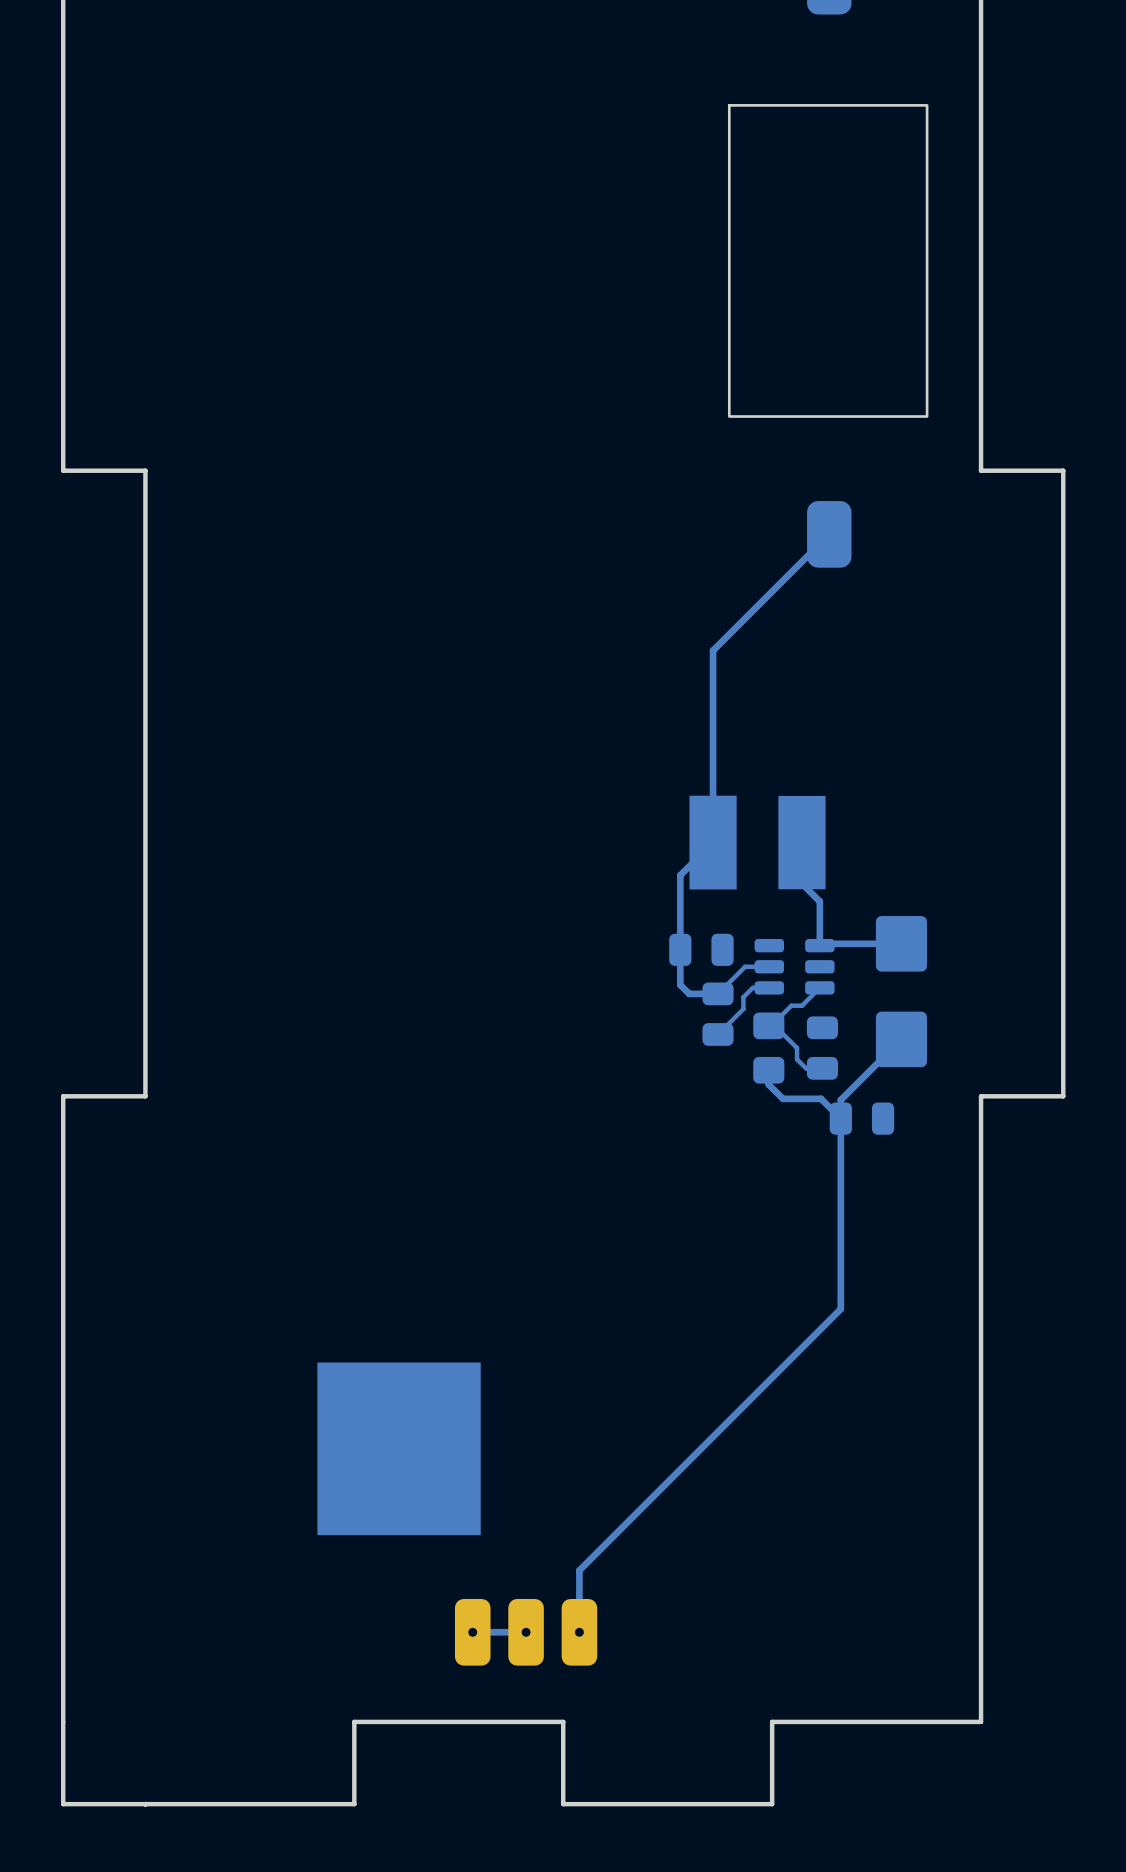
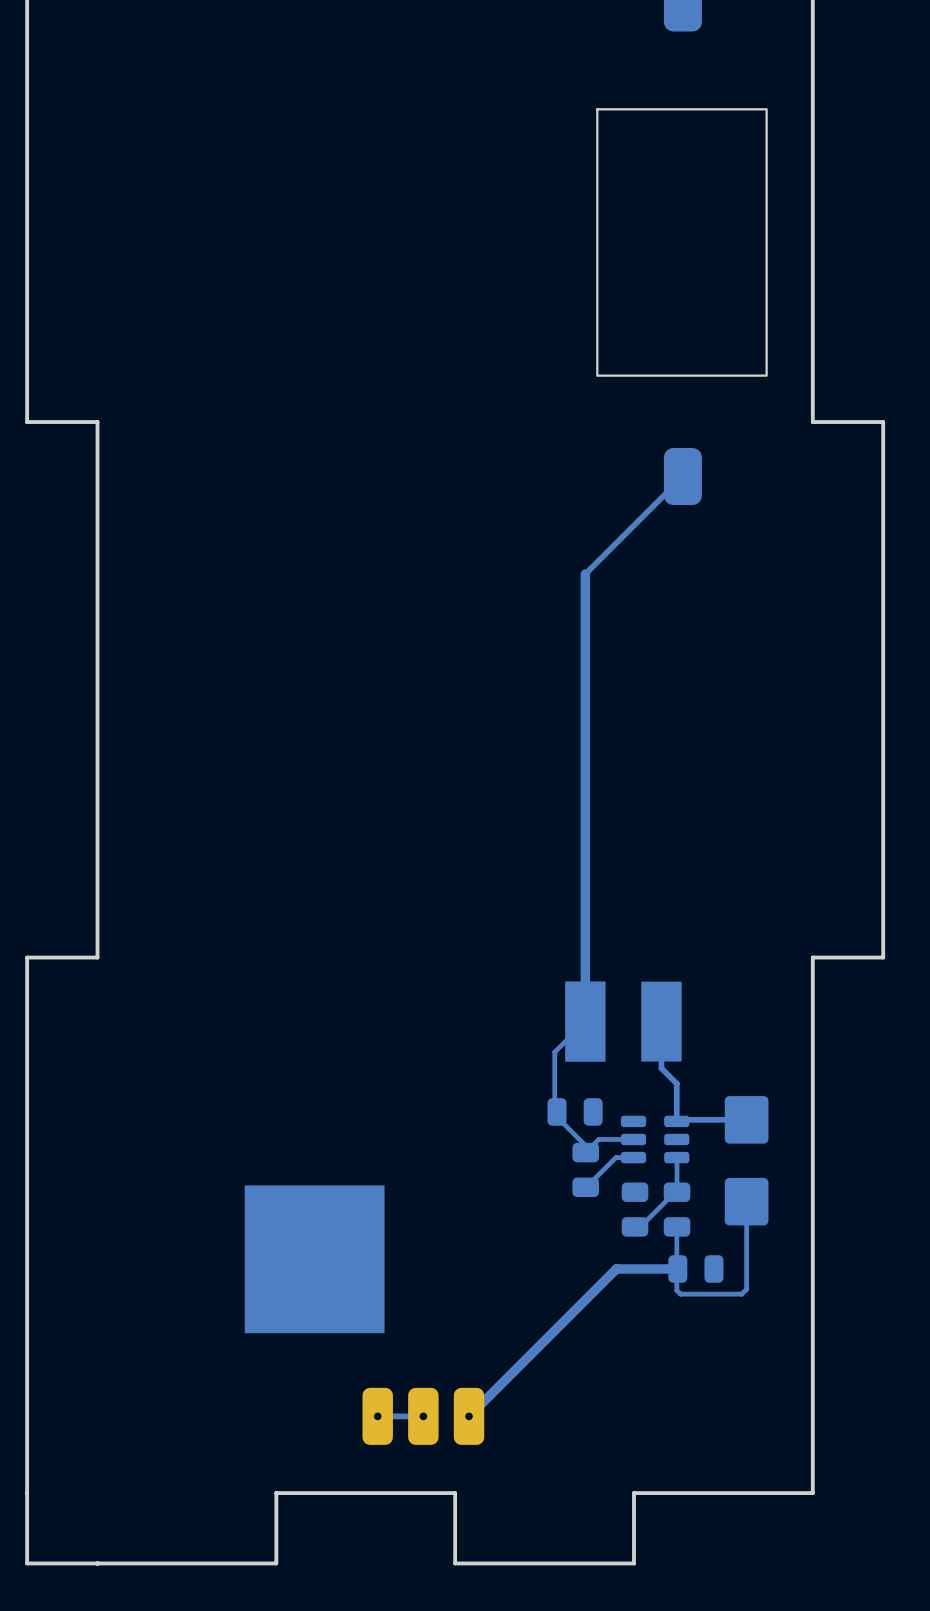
bottom track: (715, 648) (713, 650) (713, 842) (680, 875) (680, 984) (689, 993) (718, 993) (745, 966) (769, 966) -> (585, 574) (585, 1021) (554, 1052) (554, 1109) (557, 1117) (585, 1145) (585, 1152) (598, 1139) (633, 1139)
part position: (757, 842) -> (623, 1021)
bottom track: (801, 842) (801, 883) (819, 901) (819, 945) (821, 943) (901, 943) -> (661, 1033) (661, 1068) (676, 1083) (676, 1121) (678, 1119) (746, 1119)
part: (701, 949) -> none
part position: (794, 966) -> (655, 1139)
bottom track: (769, 987) (752, 987) (743, 997) (743, 1009) (718, 1034) -> none
bottom track: (819, 987) (802, 1005) (791, 1005) (771, 1025) -> none
part position: (901, 991) -> (746, 1160)
part: (718, 1014) -> none
bottom track: (768, 1025) (774, 1025) (797, 1048) (797, 1059) (806, 1068) (822, 1068) -> none
bottom track: (901, 1039) (840, 1100) (840, 1309) (579, 1570) (579, 1632) -> (677, 1268) (616, 1268) (469, 1416)
part: (768, 1048) -> none
part: (822, 1048) -> none
bottom track: (768, 1070) (768, 1084) (782, 1098) (821, 1098) (840, 1118) -> none
part: (861, 1118) -> none
part: none -> (575, 1111)
bottom track: none -> (633, 1157) (615, 1157) (585, 1187)
bottom track: none -> (676, 1157) (677, 1192) (674, 1192) (640, 1226) (635, 1226)
part: none -> (585, 1169)
bottom track: none -> (746, 1201) (746, 1289) (741, 1294) (680, 1294) (676, 1290) (676, 1227)
part: none -> (635, 1209)
part: none -> (677, 1209)
part: none -> (695, 1268)

